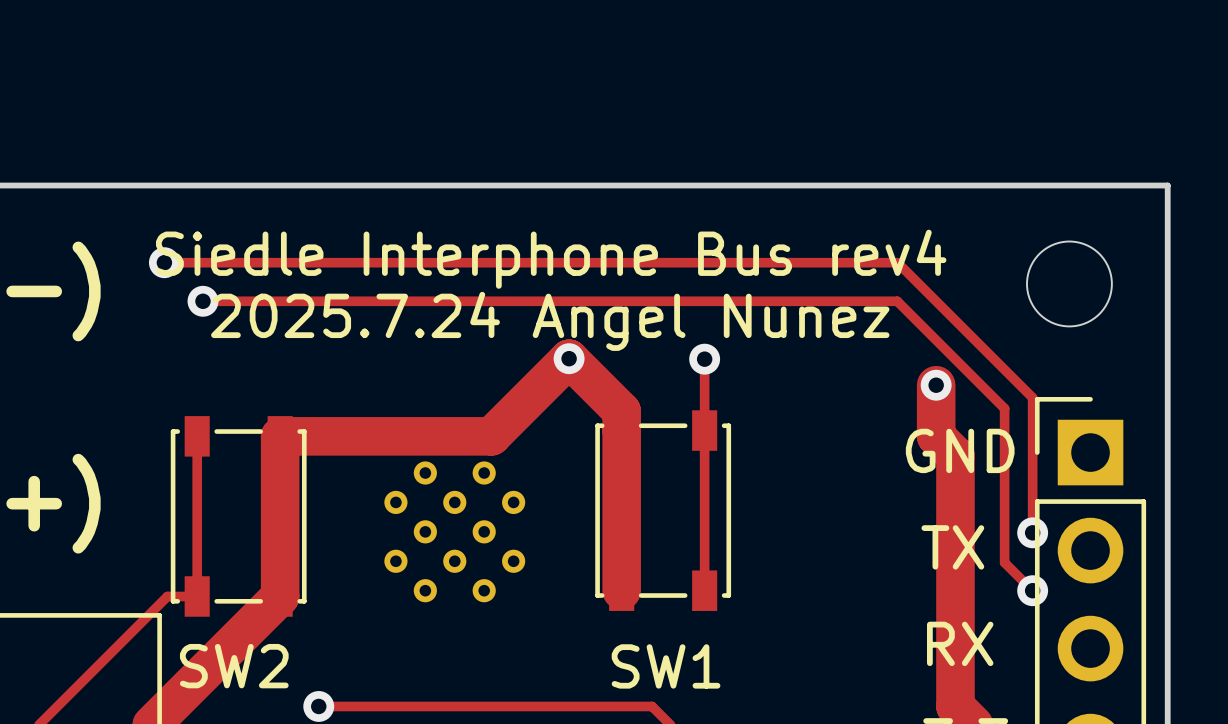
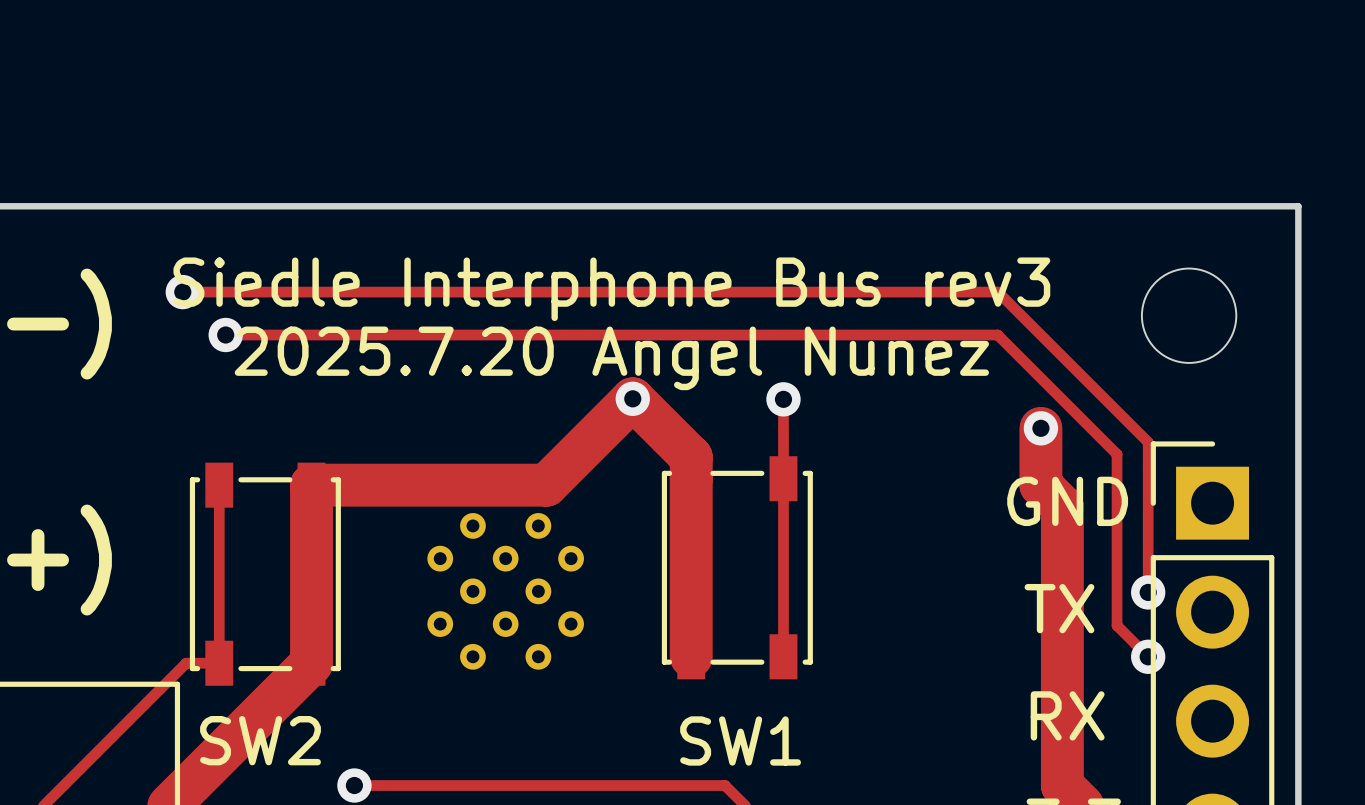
text: Siedle Interphone Bus rev4 (551, 259) -> Siedle Interphone Bus rev3 (611, 289)
text: 2025.7.24 Angel Nunez (550, 321) -> 2025.7.20 Angel Nunez (611, 358)

